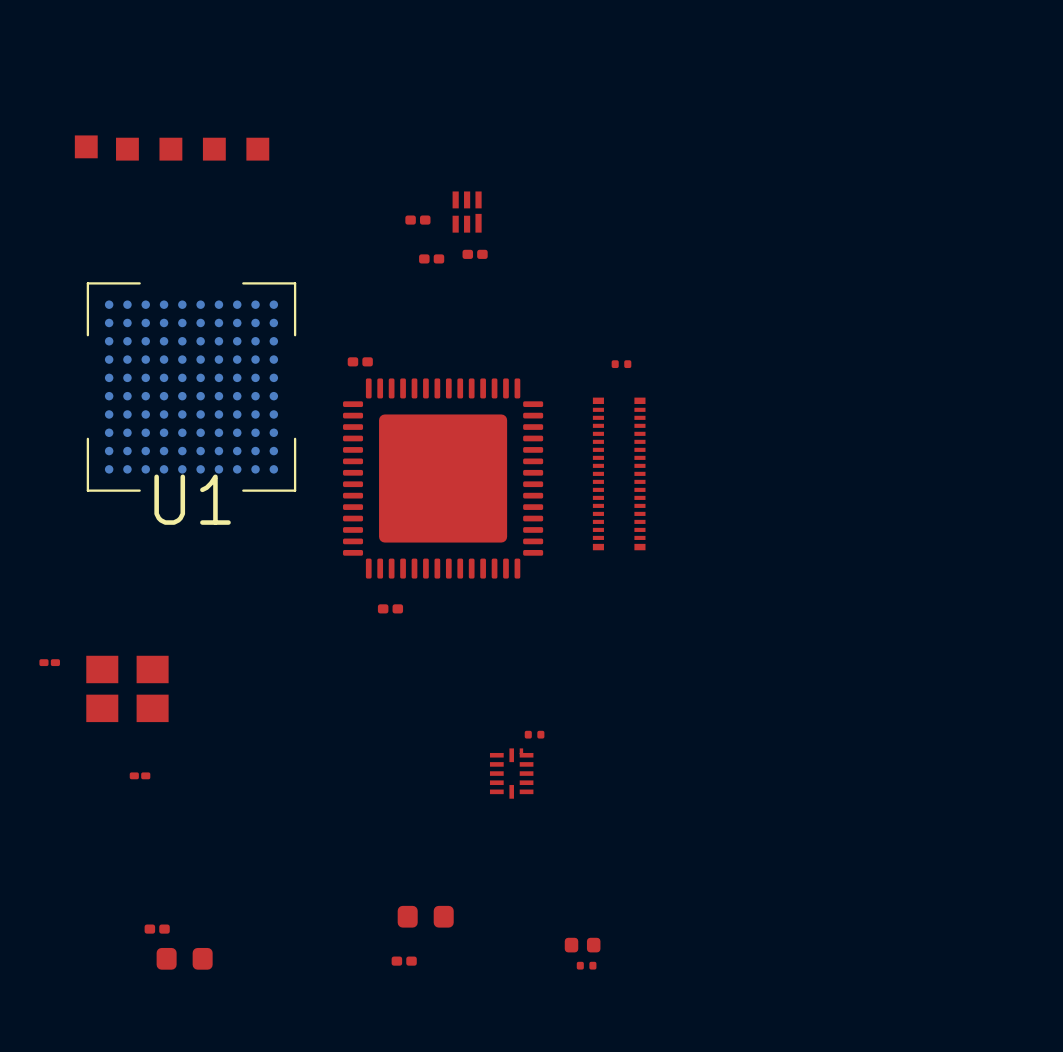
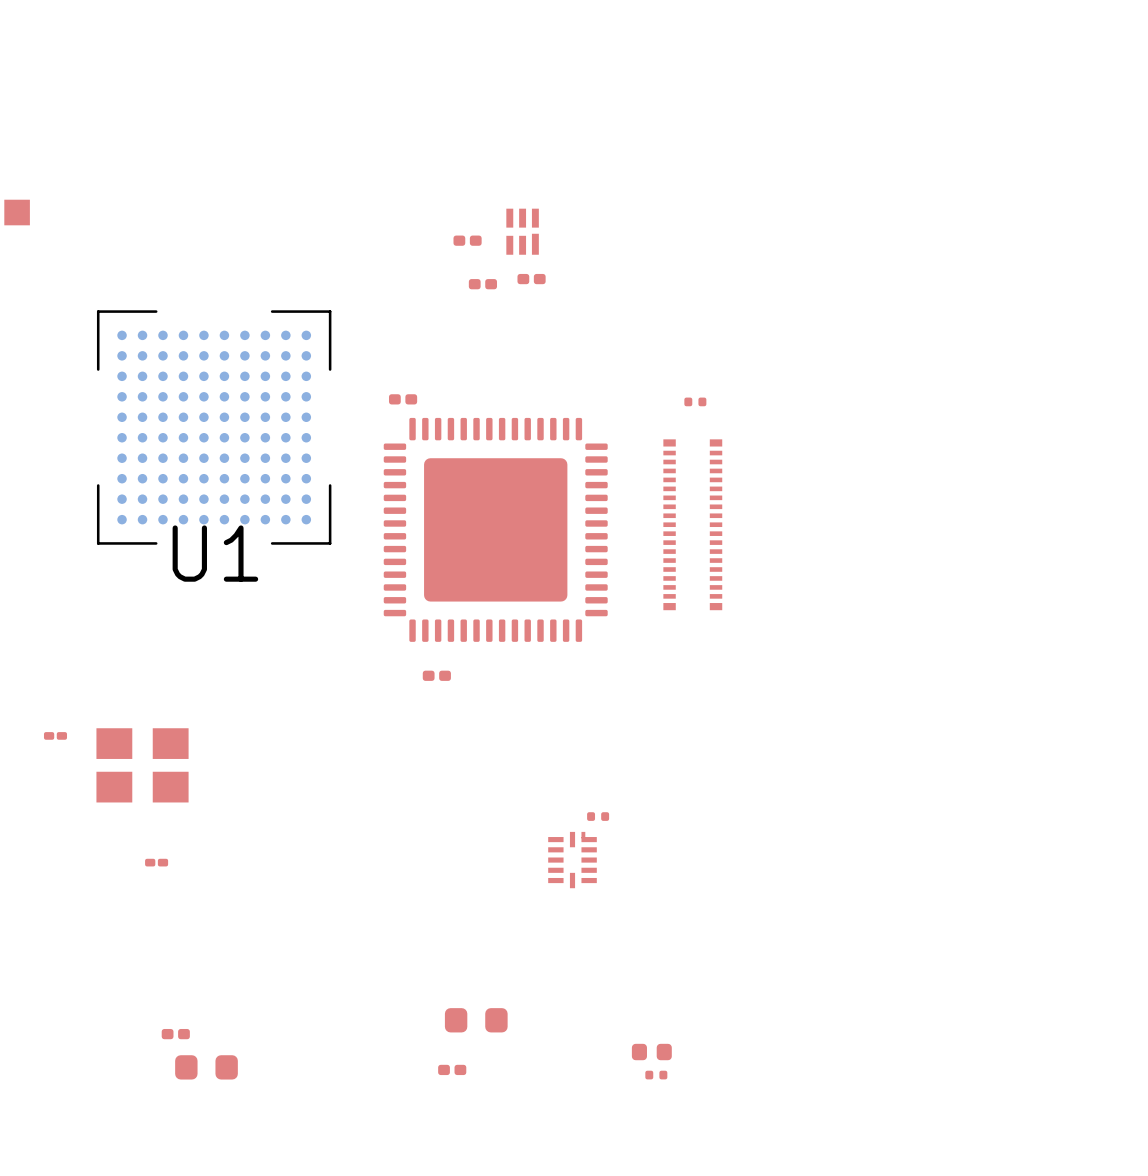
part: (86, 146) -> none
part: (127, 149) -> none
part: (170, 149) -> none
part: (214, 149) -> none
part: (257, 149) -> none
part: none -> (17, 212)

